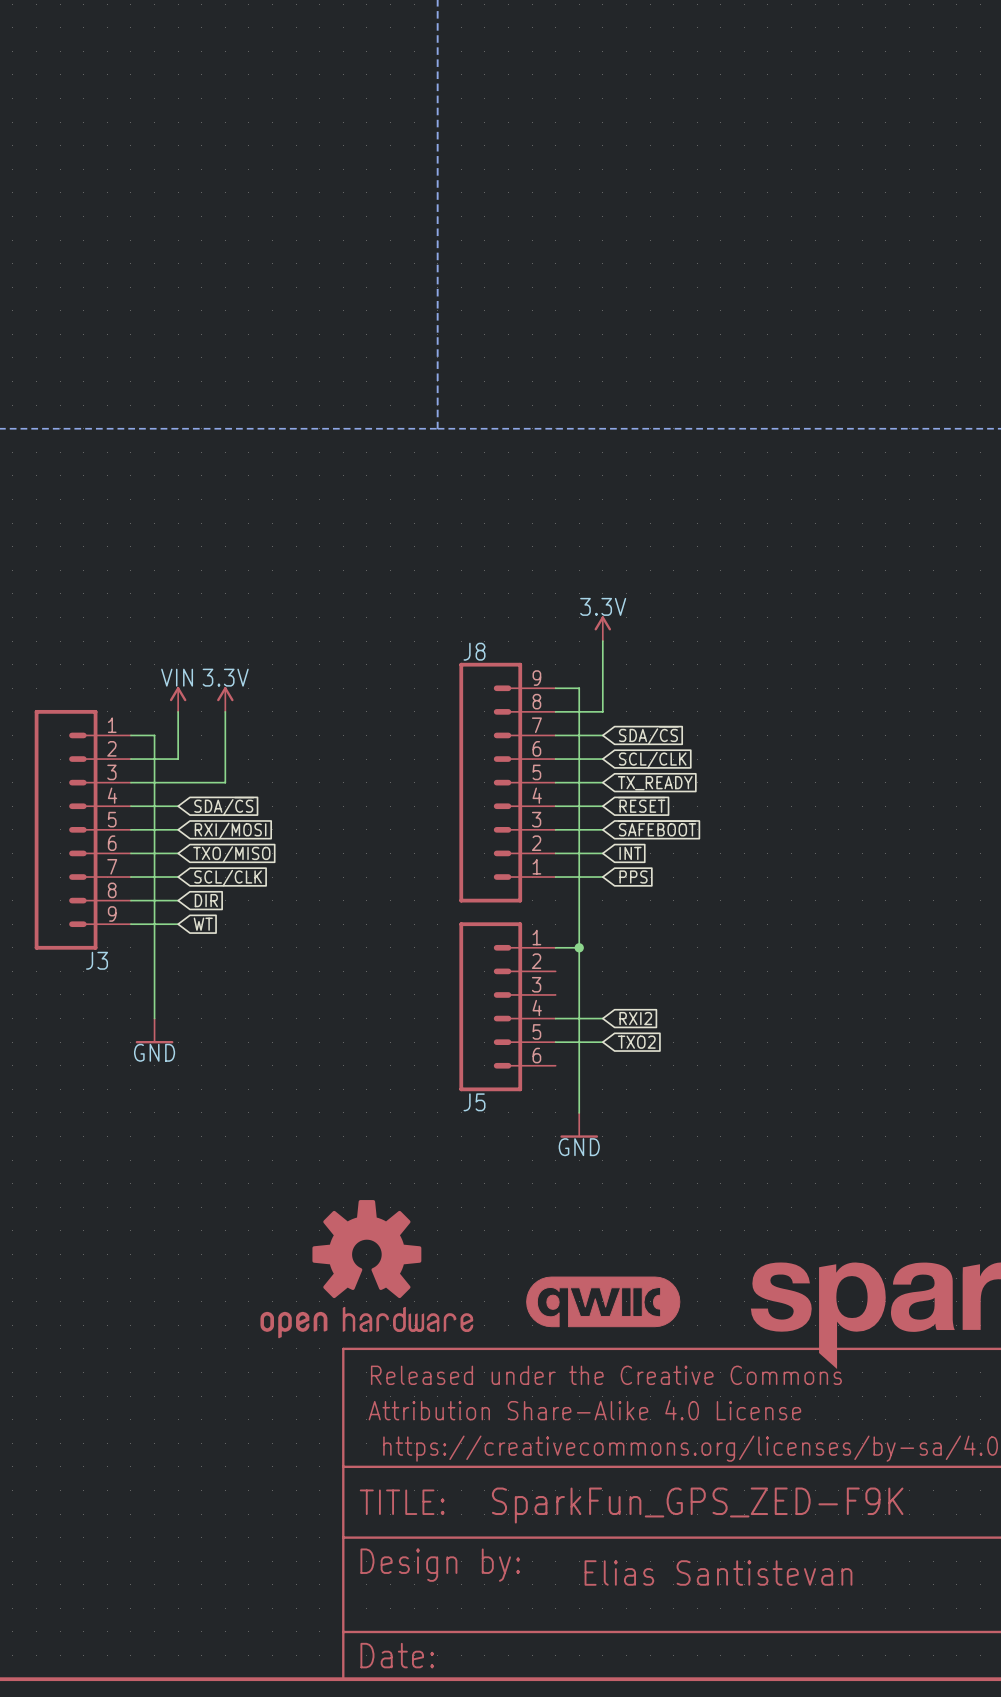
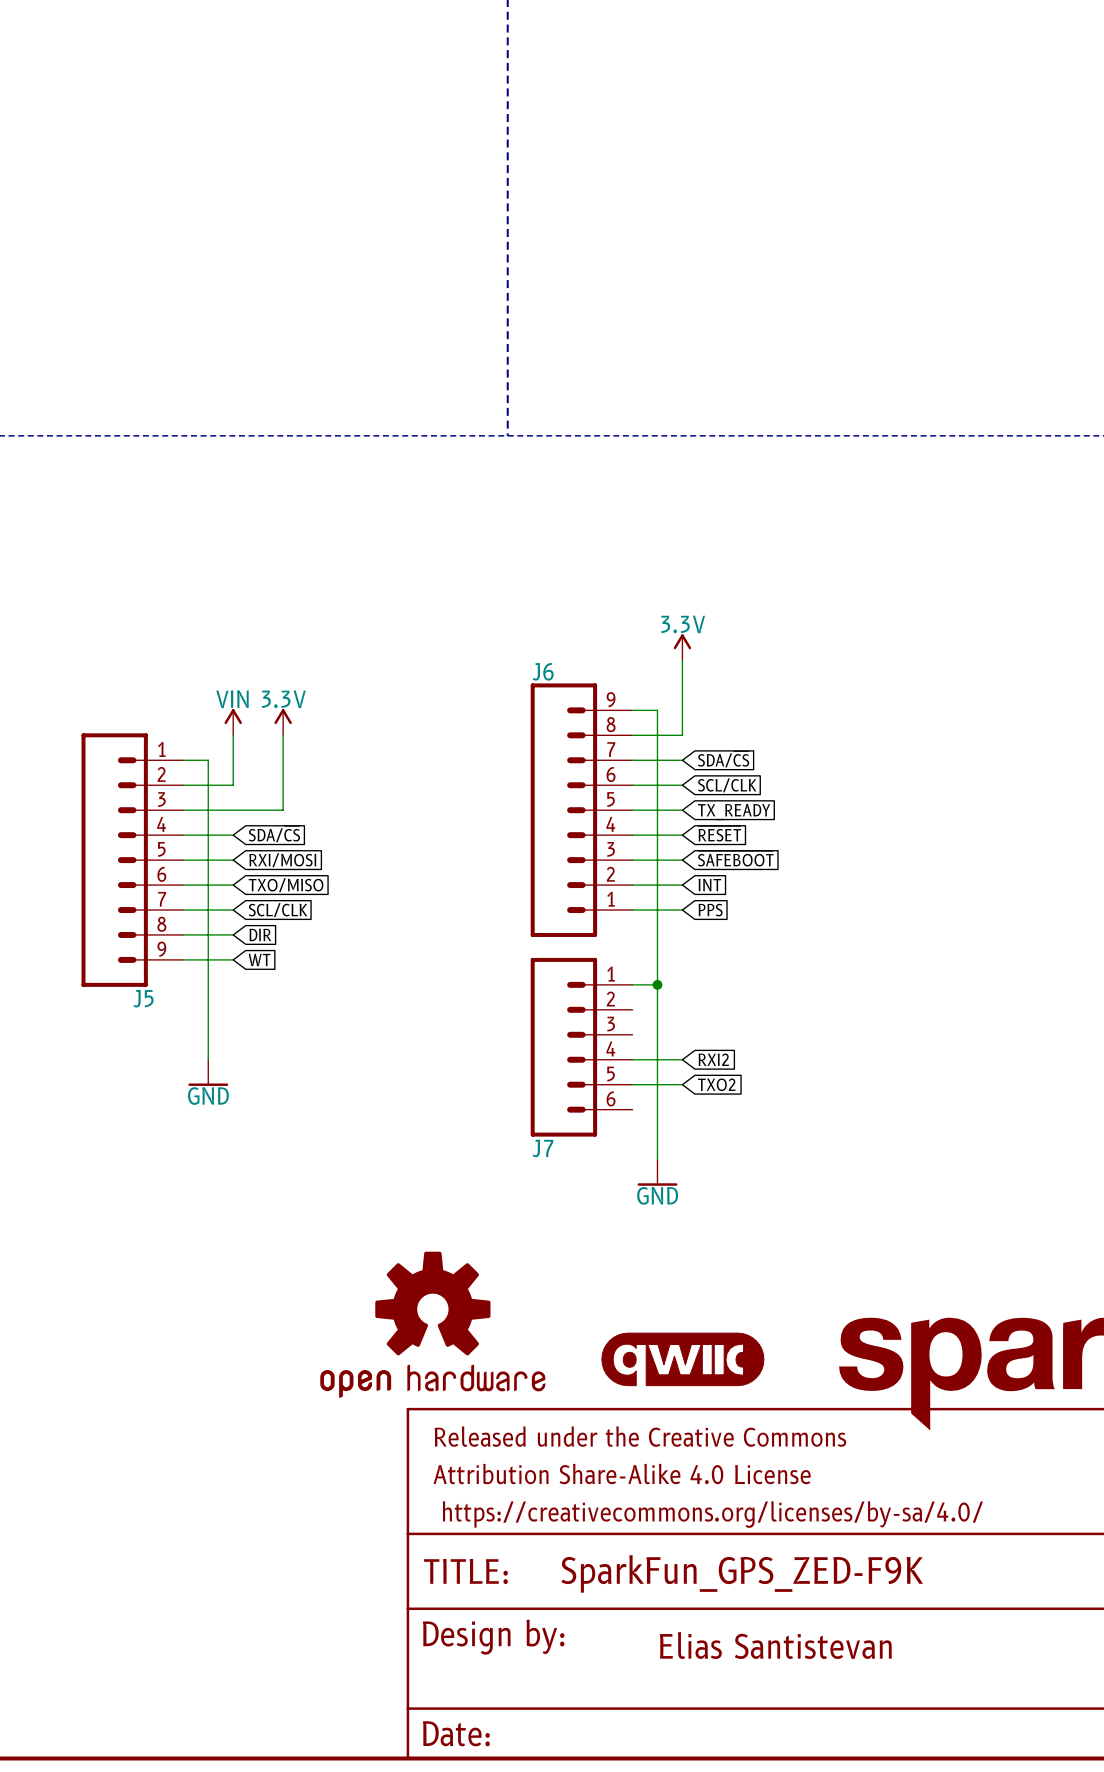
J8 name: J8 (474, 651) -> J6 (543, 671)
J3 name: J3 (97, 960) -> J5 (143, 998)
J5 name: J5 (474, 1102) -> J7 (543, 1148)

